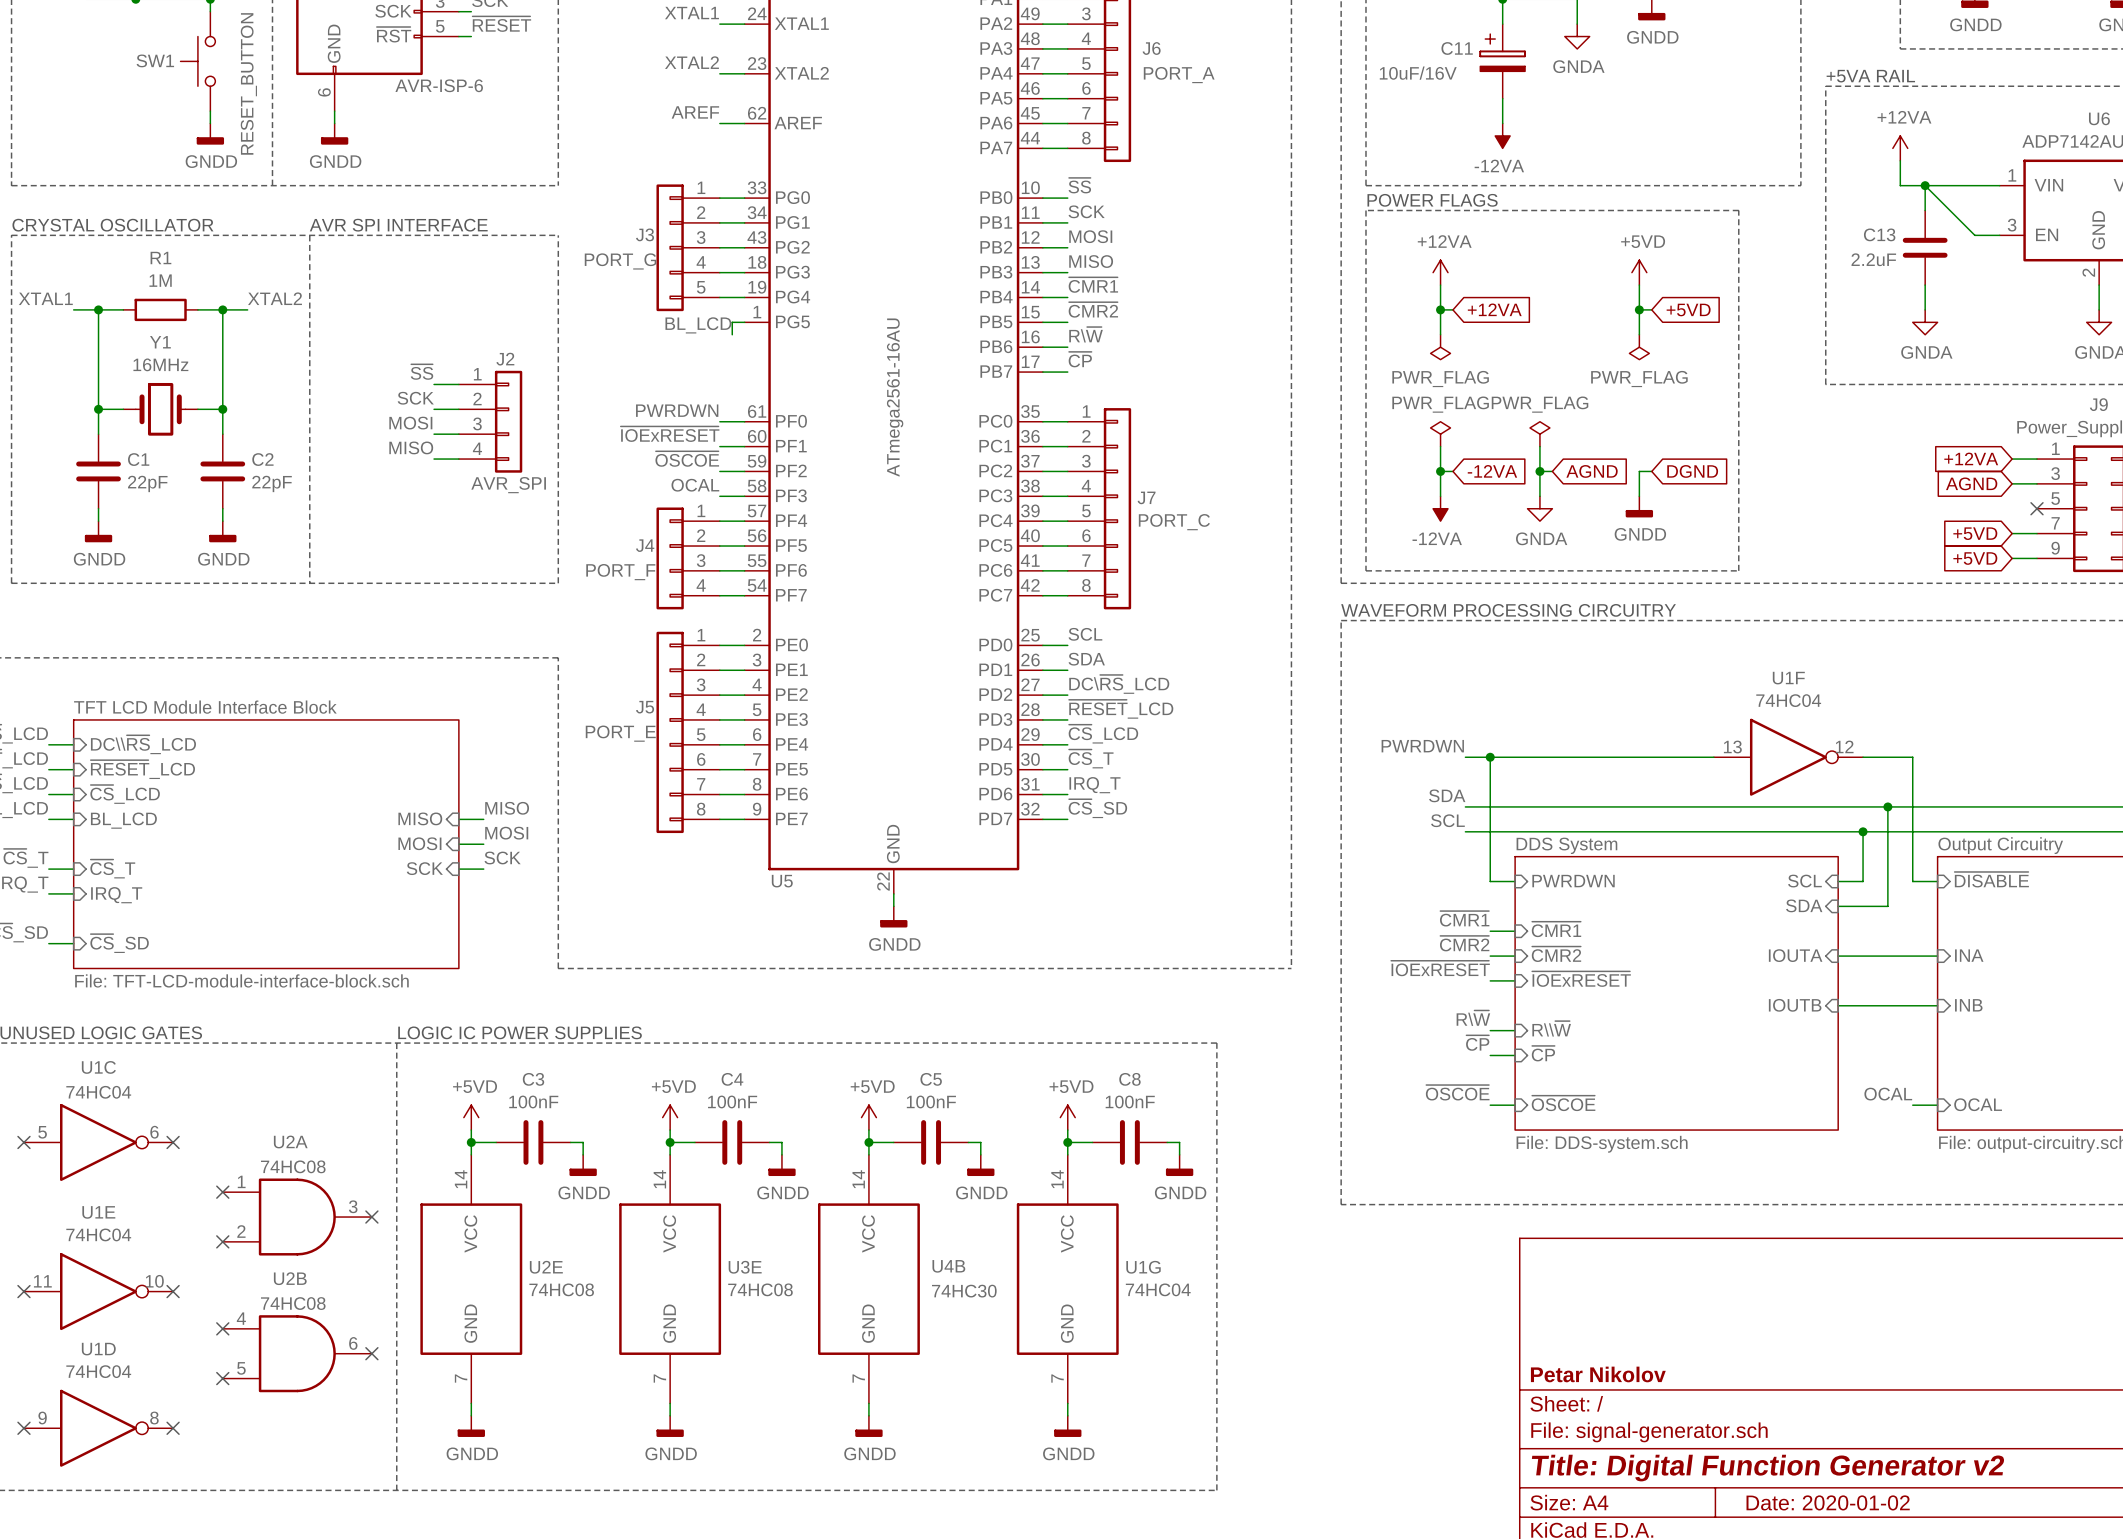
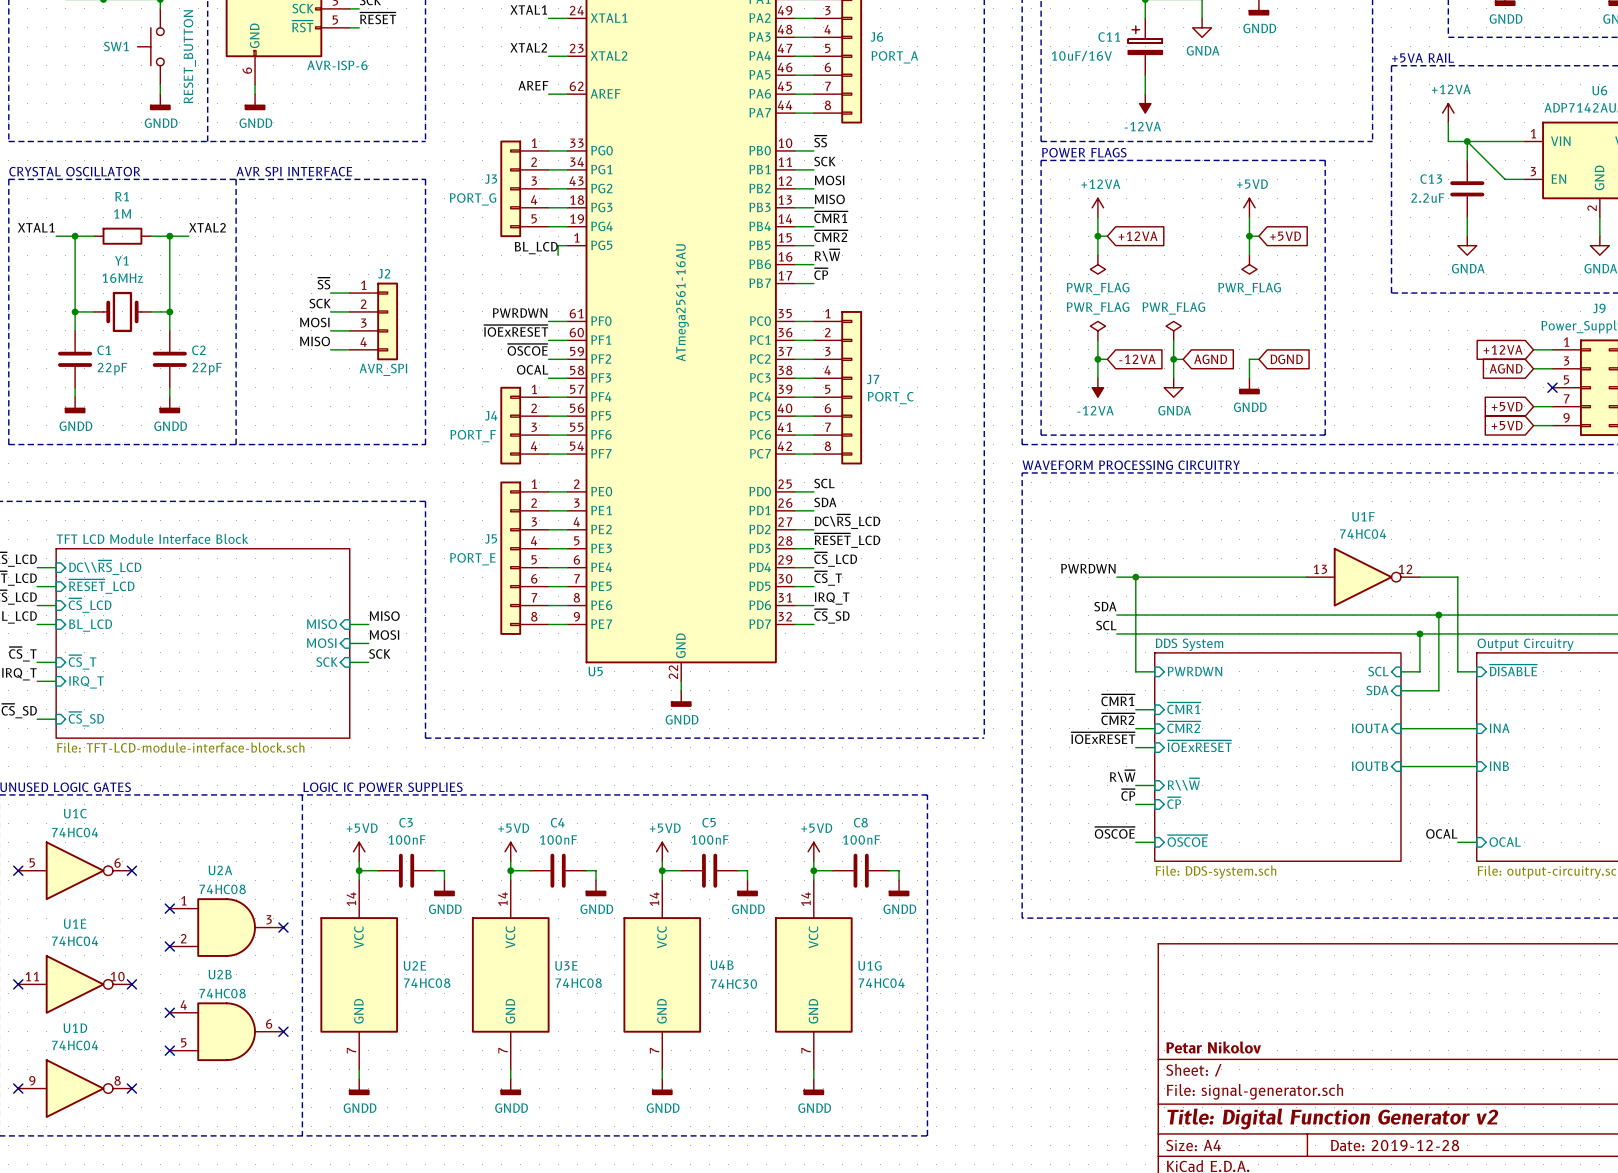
title block: Date: 2020-01-02 (1828, 1502) -> Date: 2019-12-28 (1395, 1145)

